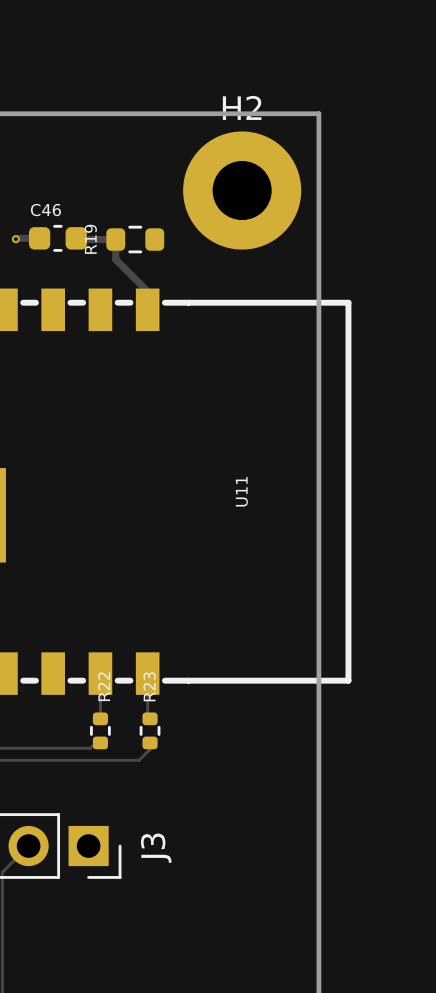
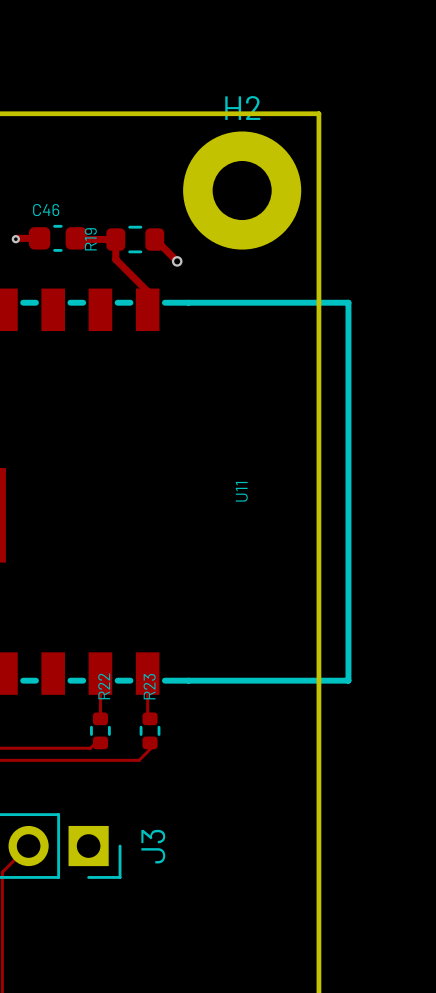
track: none -> (154, 239) (177, 261)
via: none -> (177, 261)

